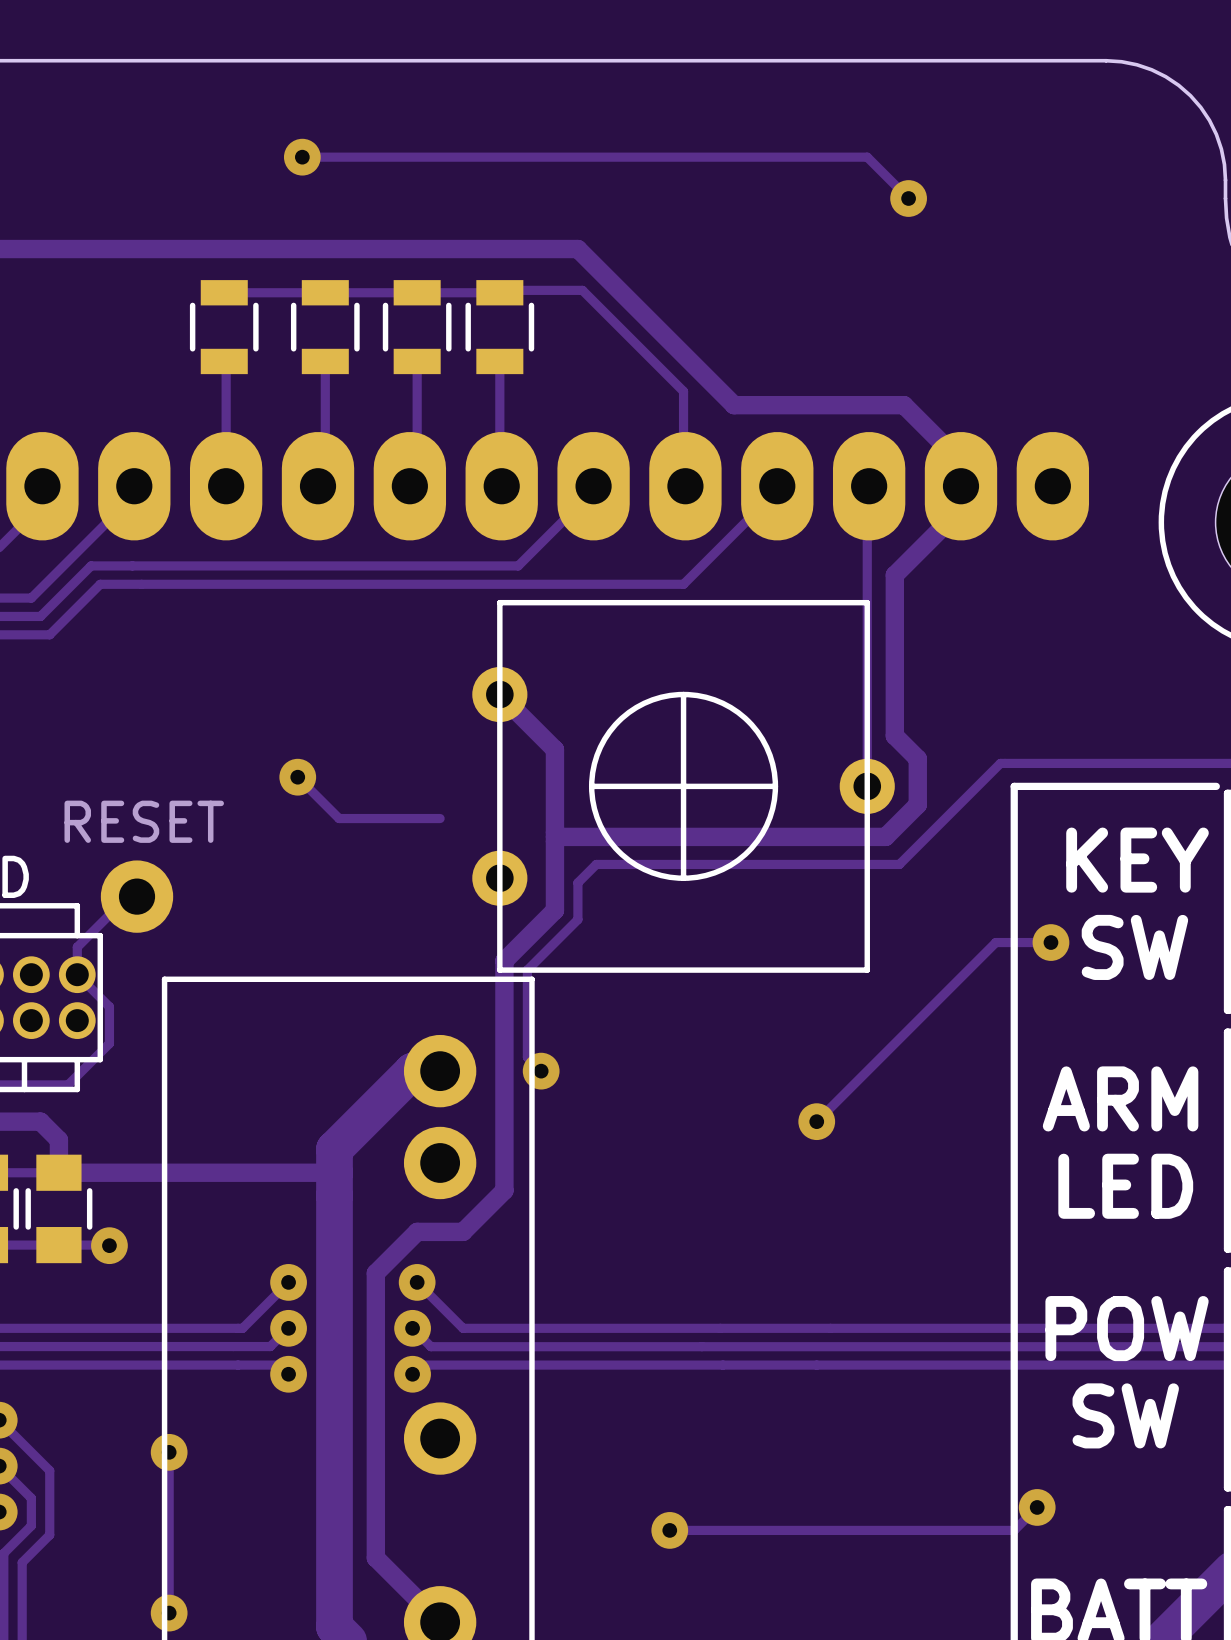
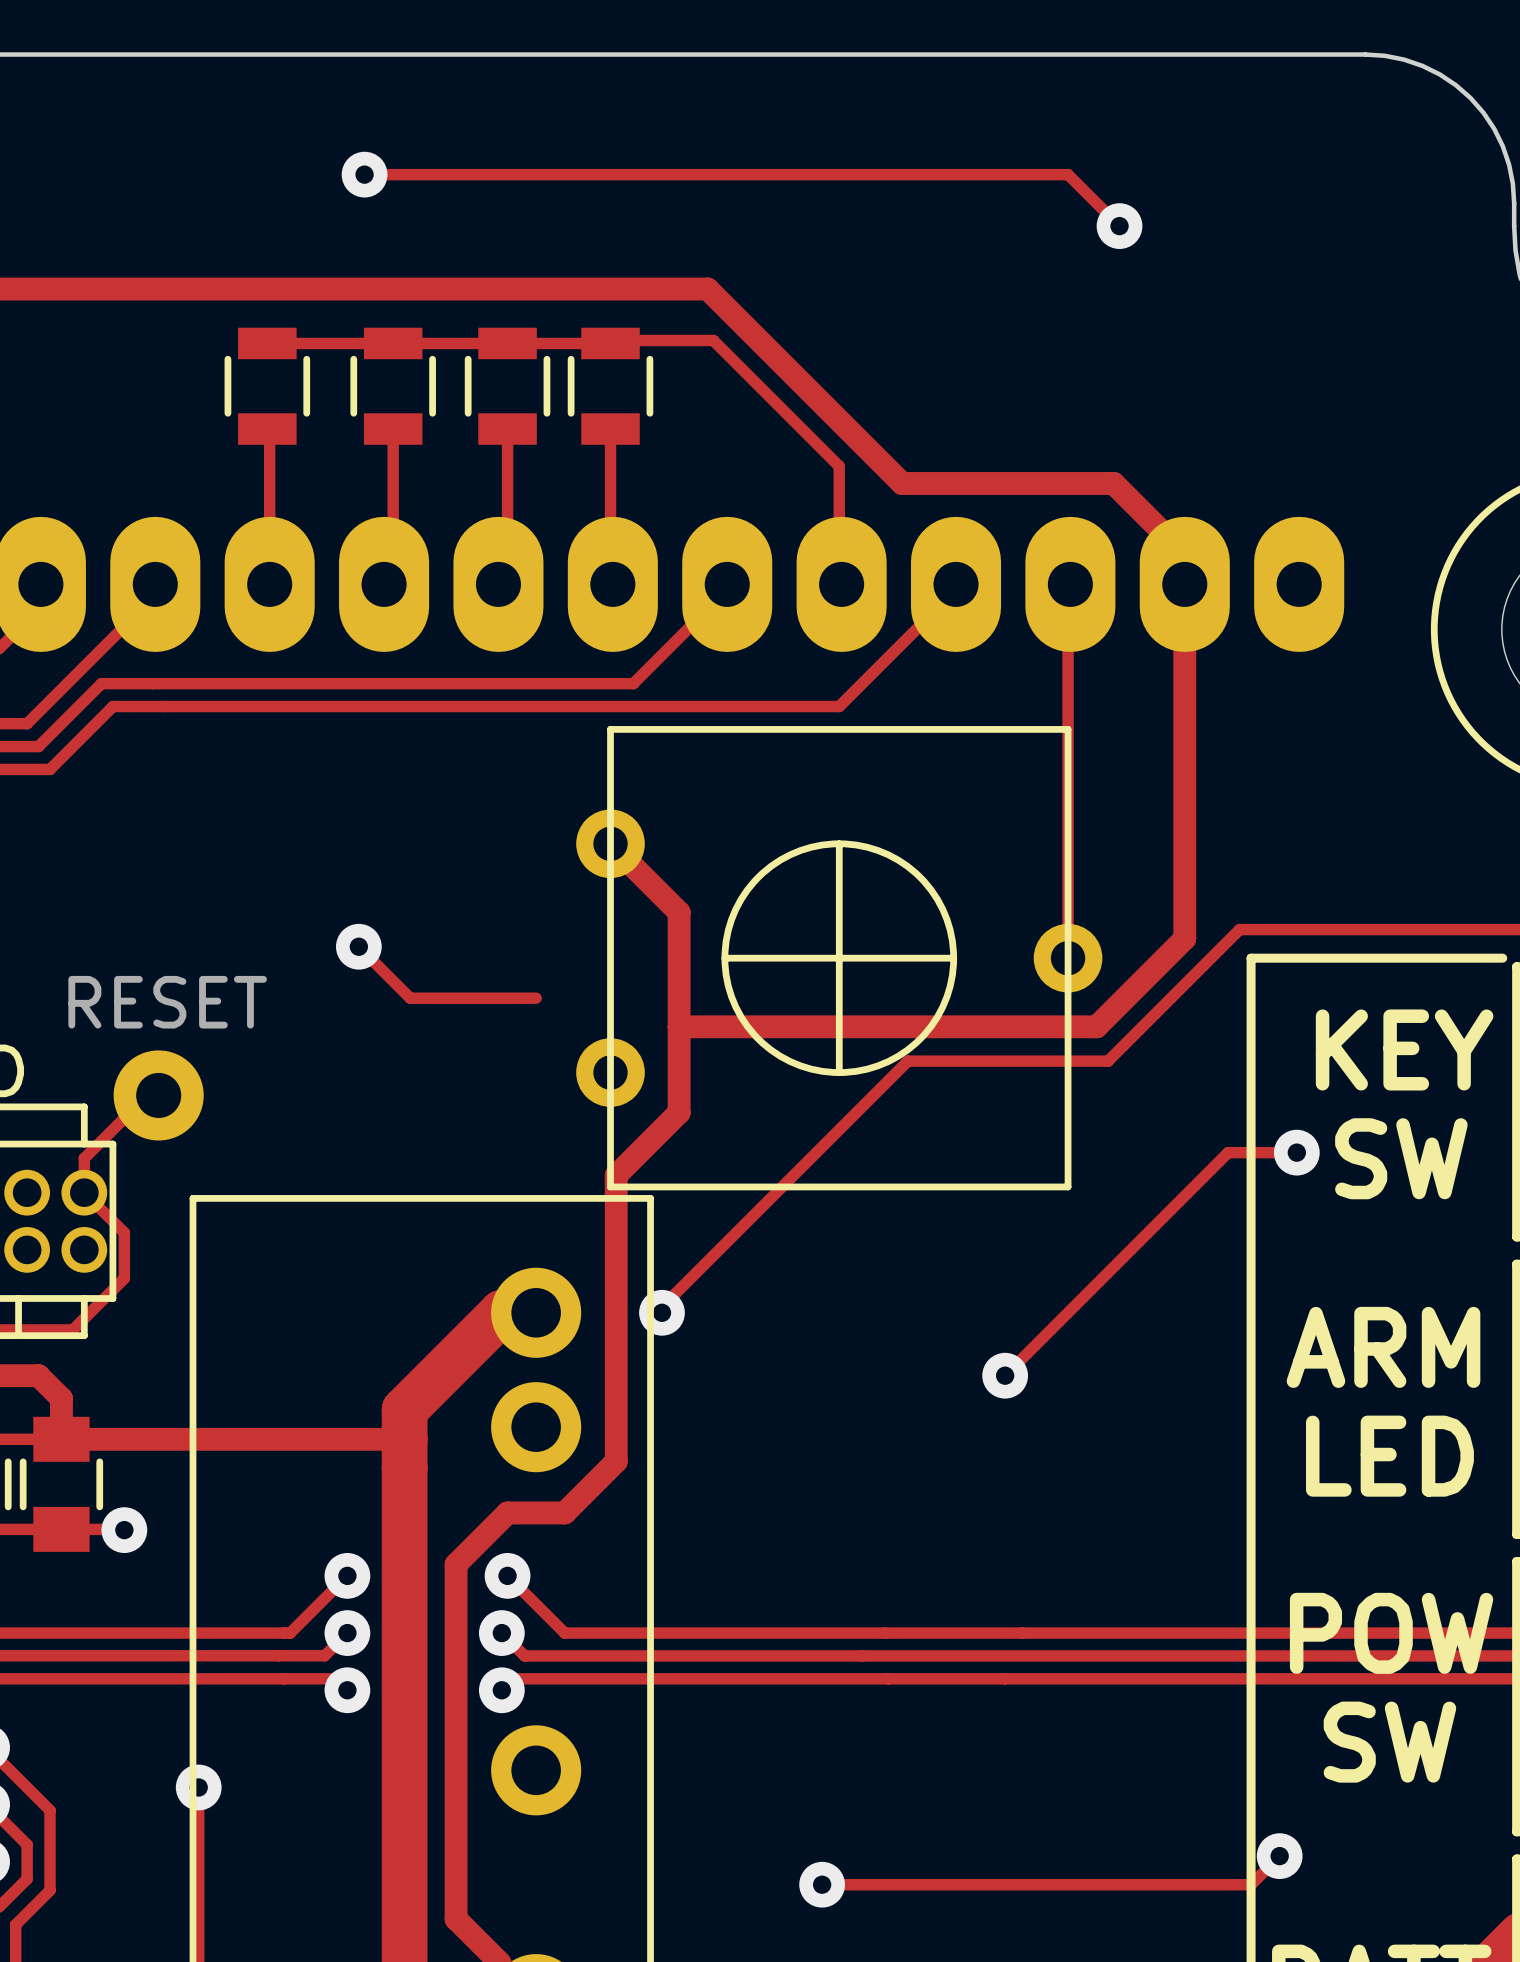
track: (960, 508) (894, 575) (894, 735) (917, 758) (917, 804) (885, 836) (554, 836) -> (1184, 612) (1184, 938) (1096, 1026) (679, 1026)
track: (1005, 763) (1000, 763) (899, 864) (596, 864) (577, 882) (577, 919) (527, 970) (527, 1057) (541, 1071) -> (1239, 929) (1108, 1061) (907, 1061) (661, 1307)

